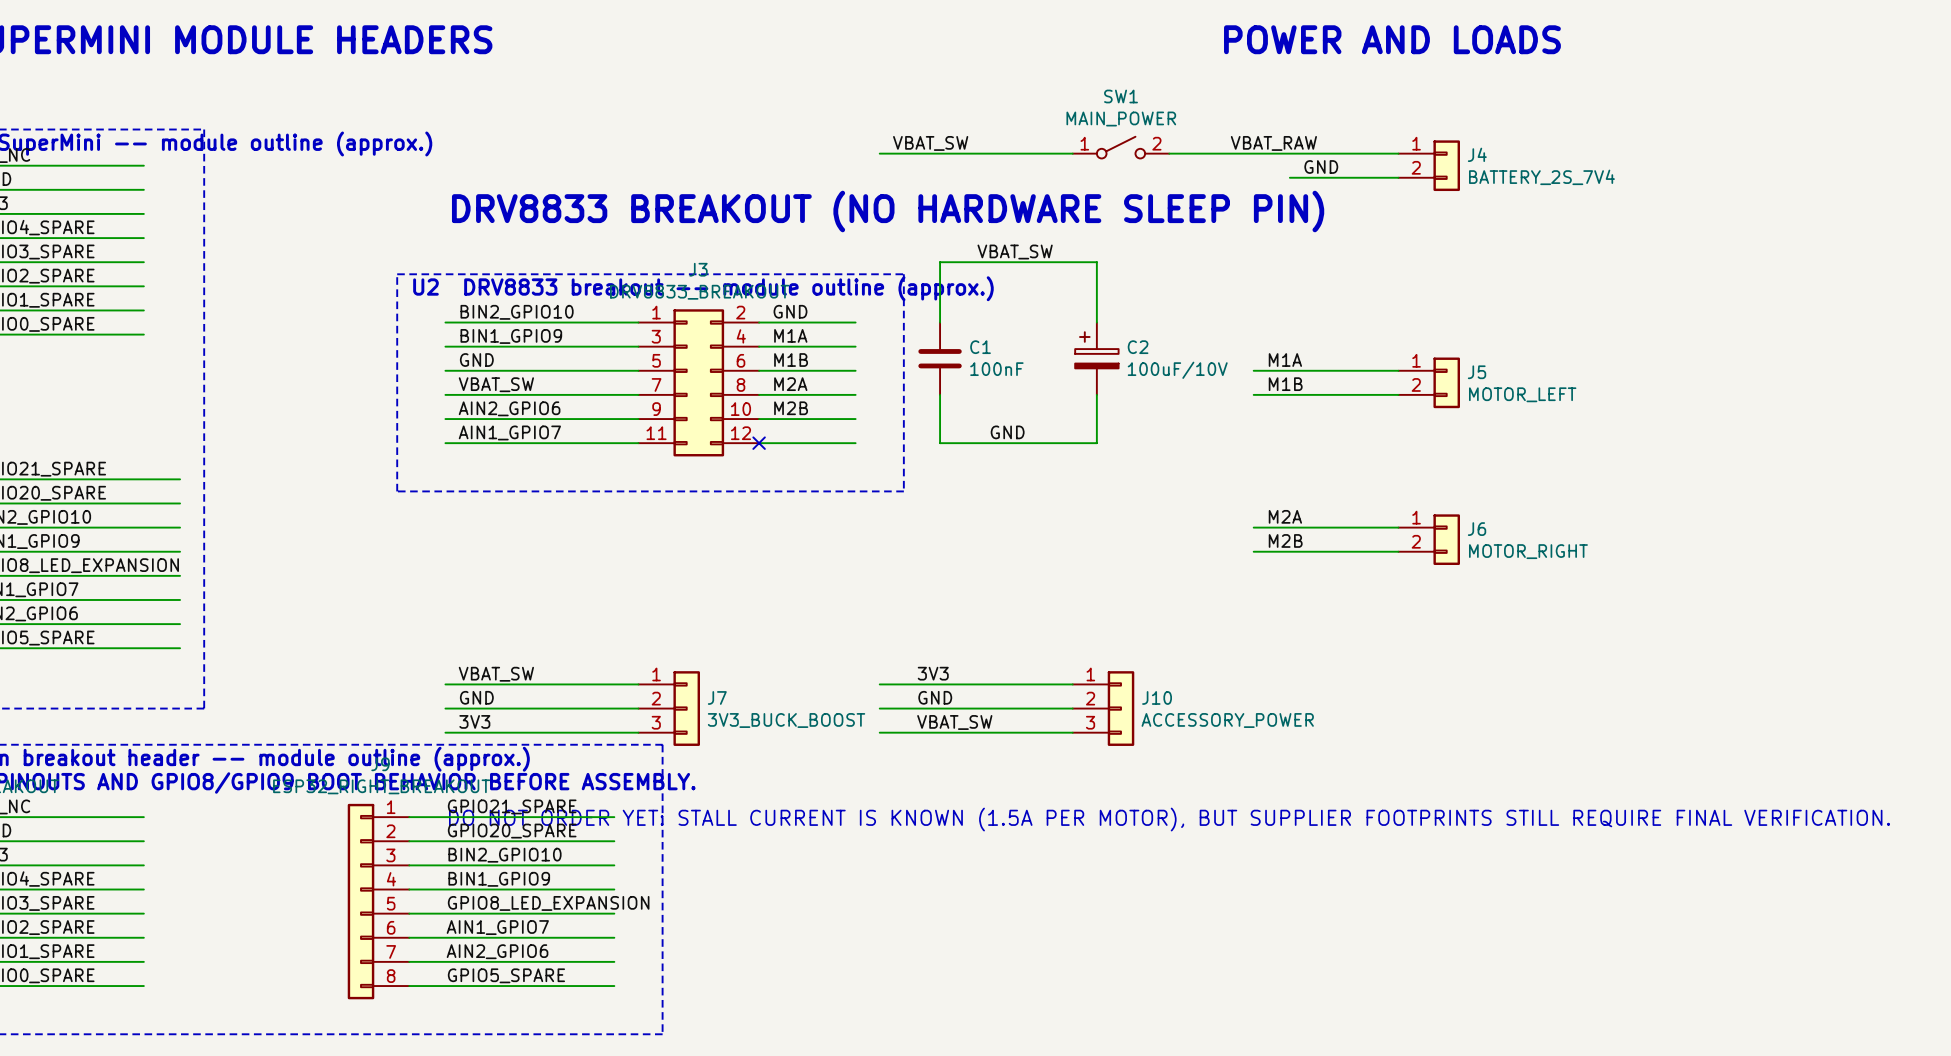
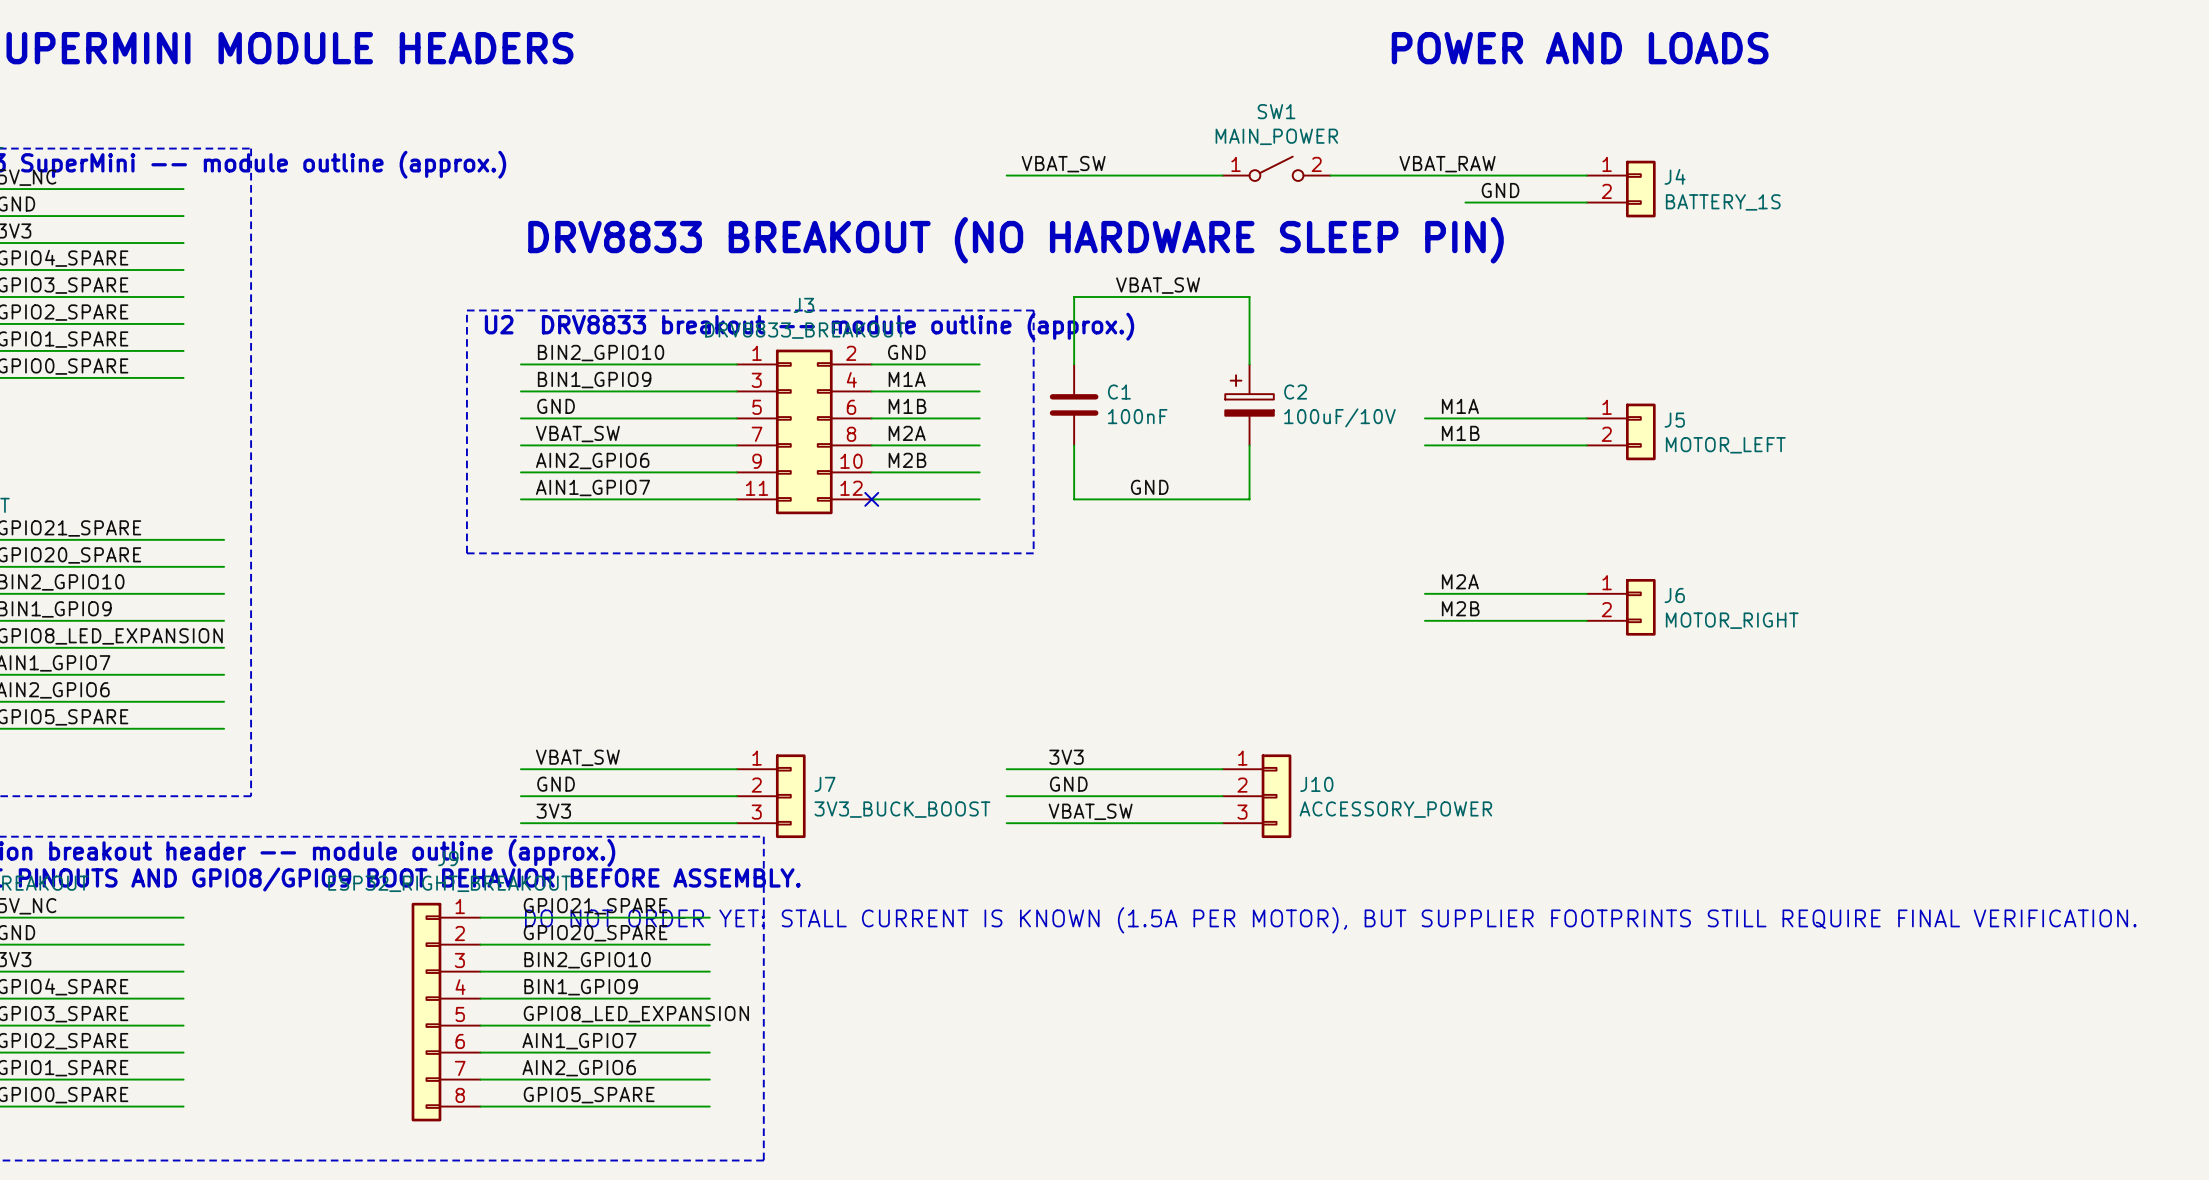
J4 value: BATTERY_2S_7V4 (1541, 177) -> BATTERY_1S (1723, 202)

